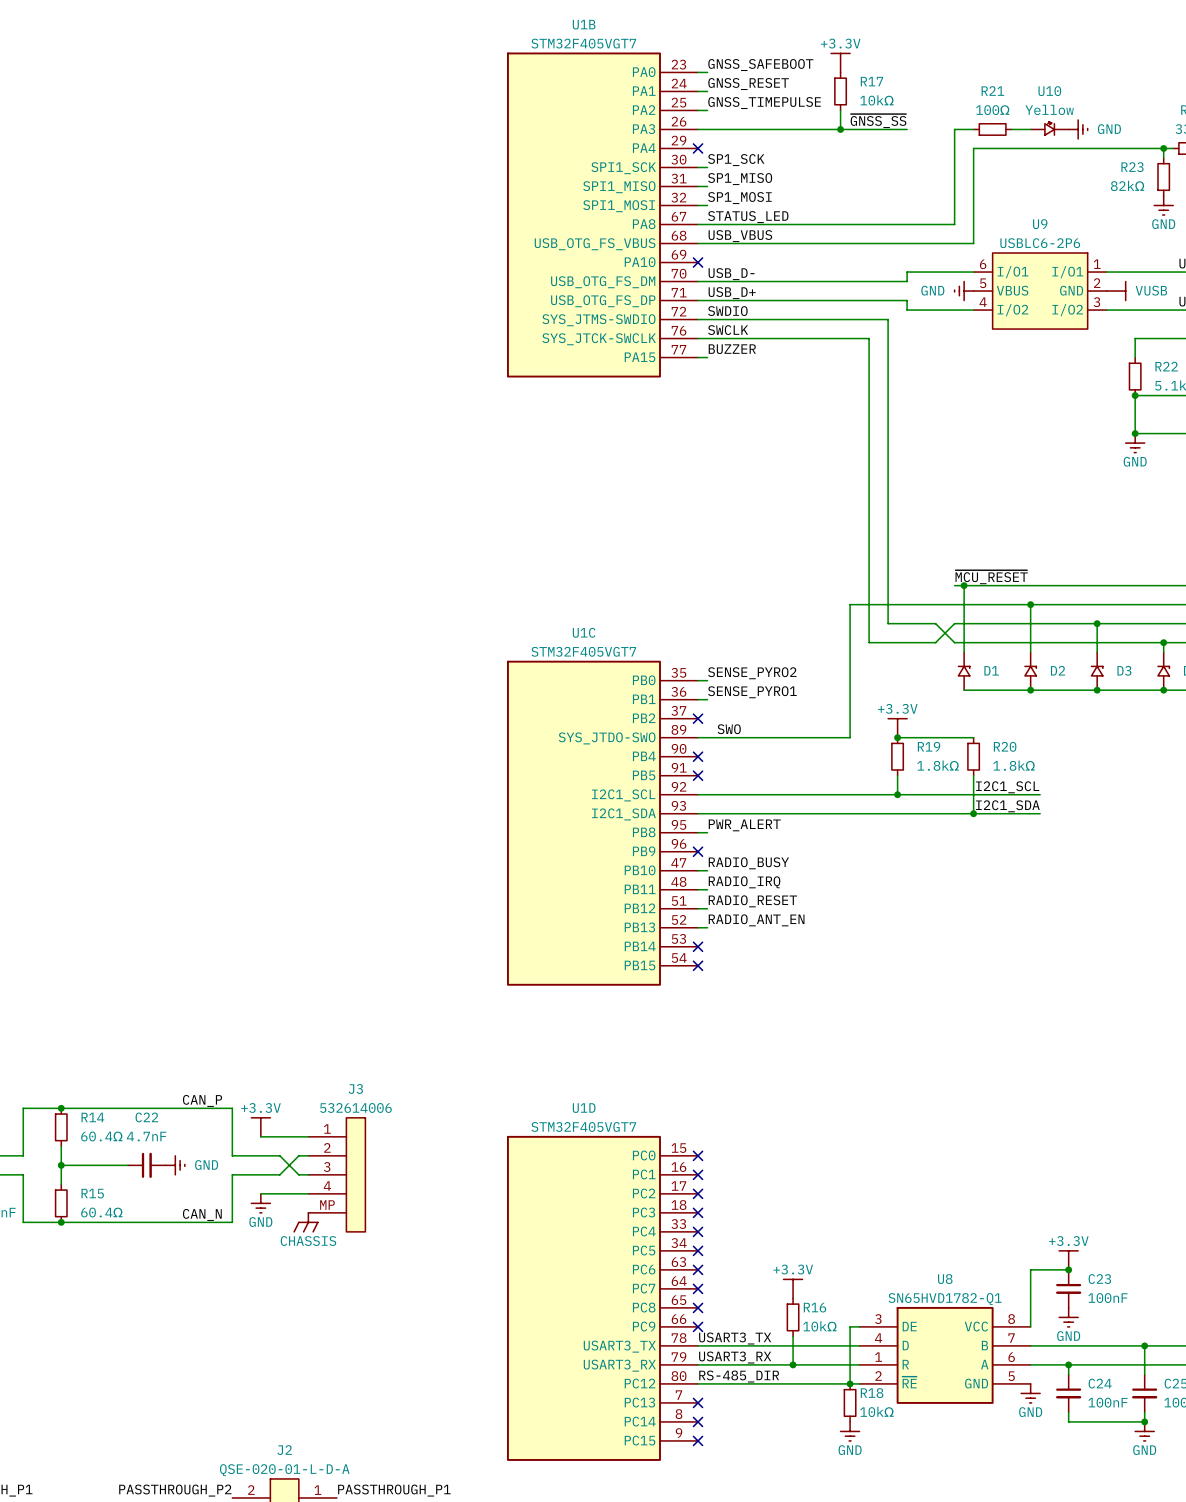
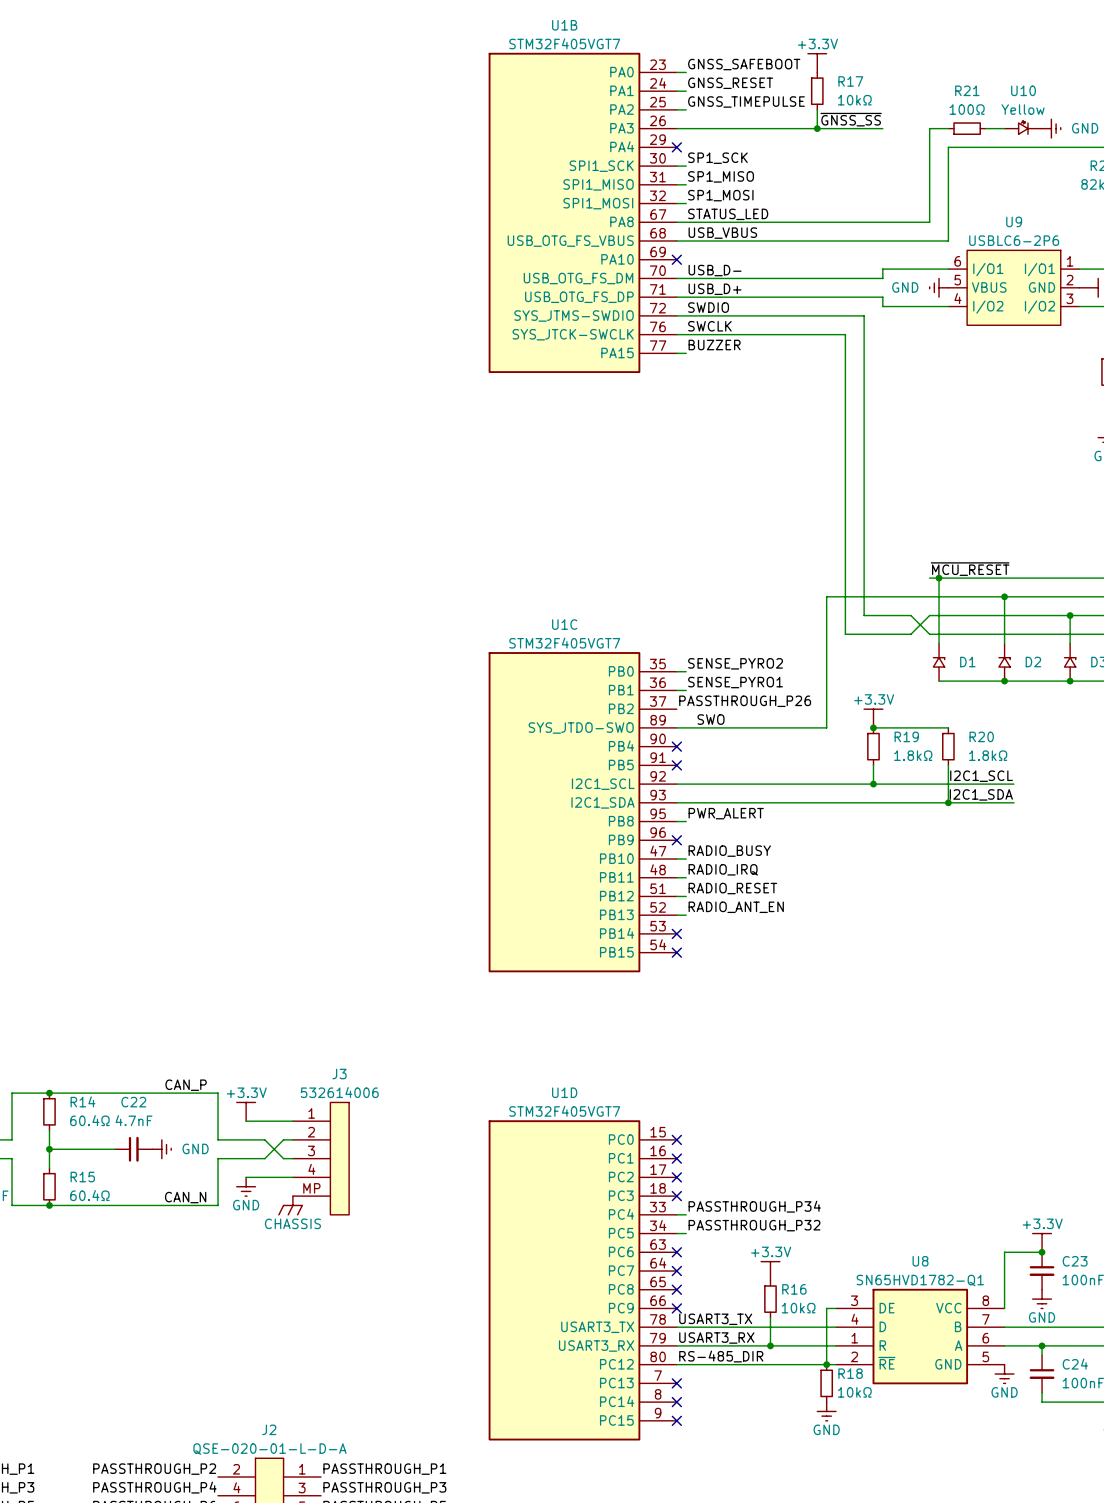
label: none -> PASSTHROUGH_P26 (745, 701)
no-connect mark: (698, 718) -> none
label: none -> PASSTHROUGH_P34 (754, 1206)
wire: none -> (676, 1214) (686, 1214)
no-connect mark: (698, 1231) -> none
label: none -> PASSTHROUGH_P32 (754, 1225)
wire: none -> (676, 1233) (686, 1233)
no-connect mark: (698, 1250) -> none

